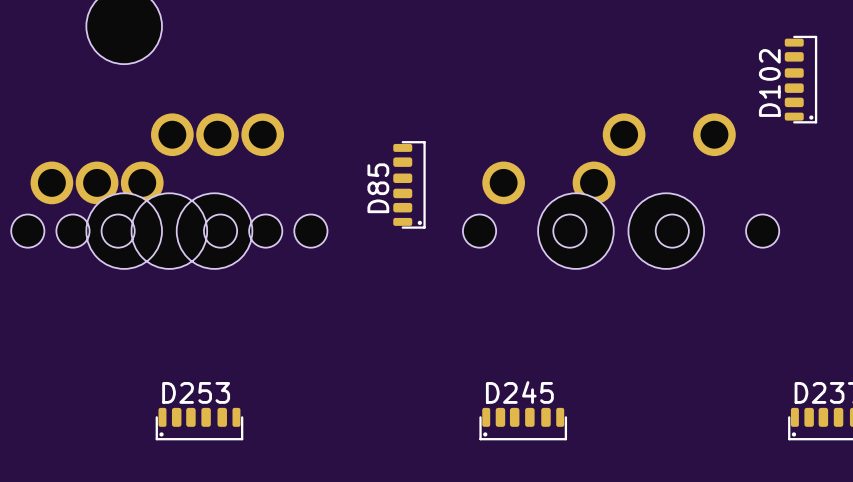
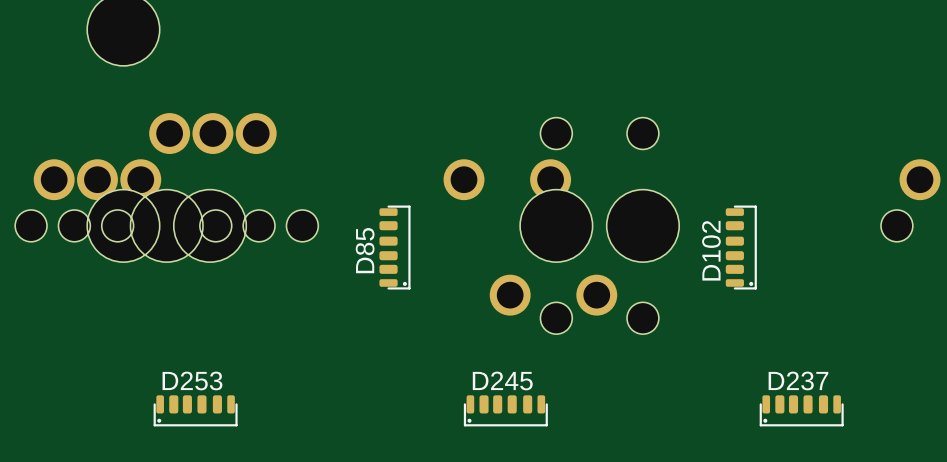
D102 position: (800, 79) -> (741, 247)
D85 position: (409, 184) -> (394, 247)
part: (575, 191) -> none
part: (666, 191) -> none
part: none -> (518, 225)
part: none -> (604, 225)

